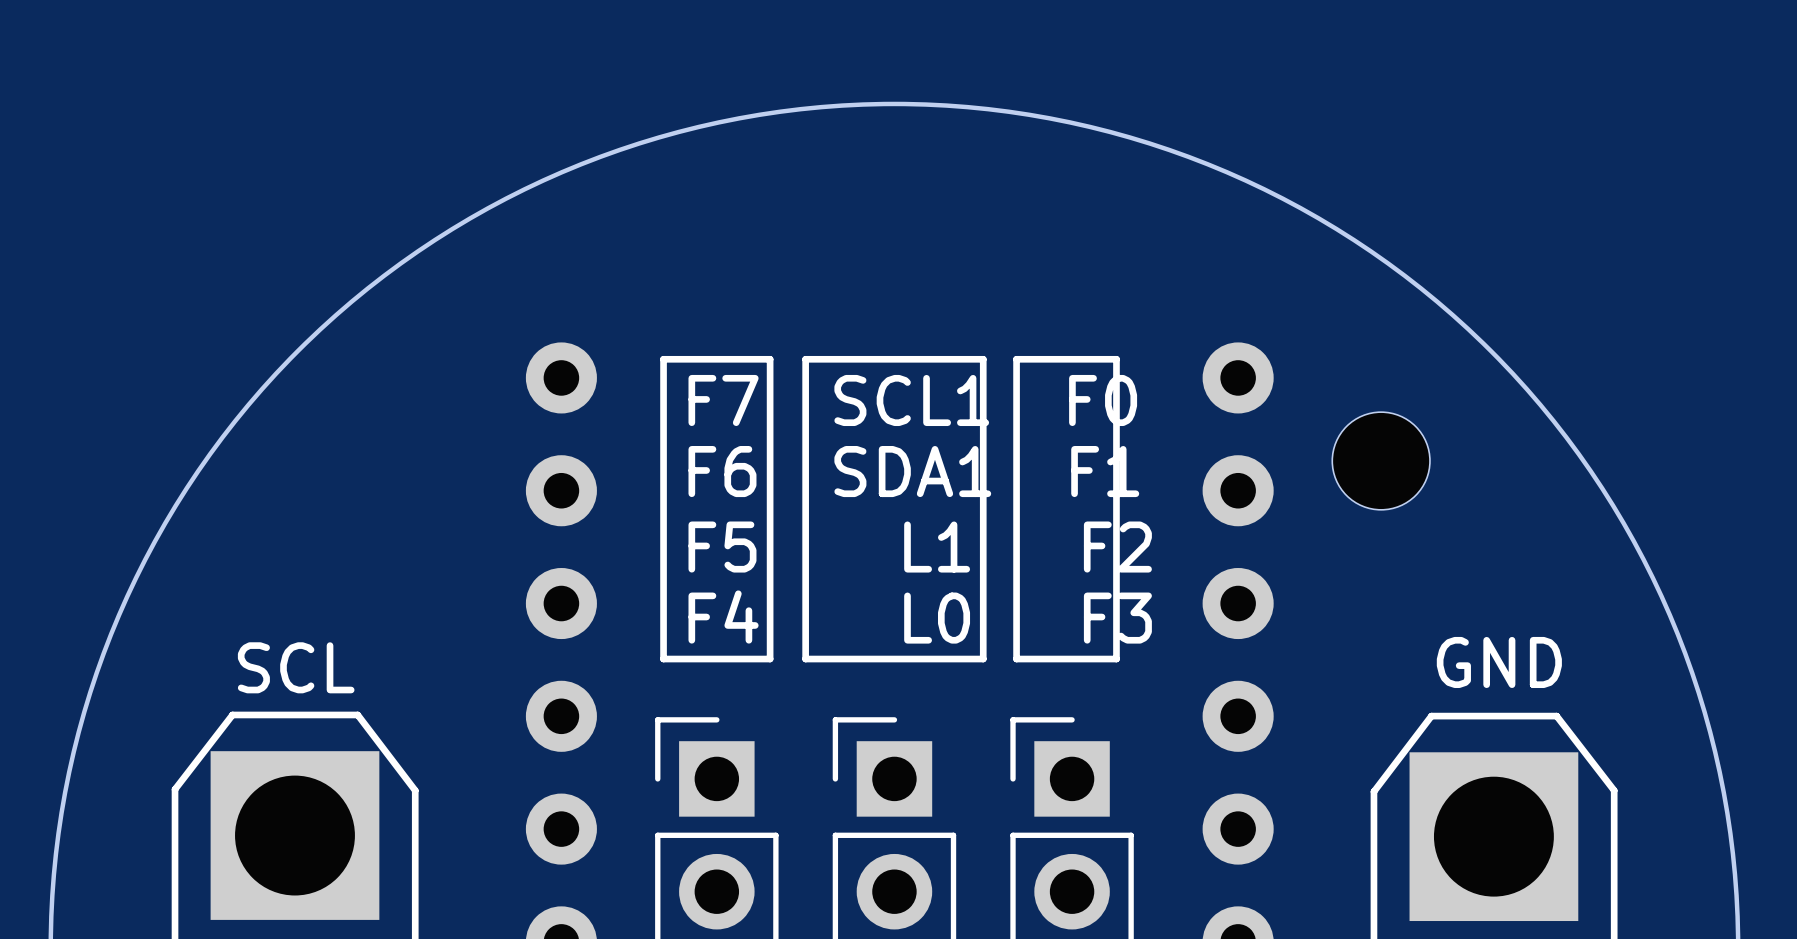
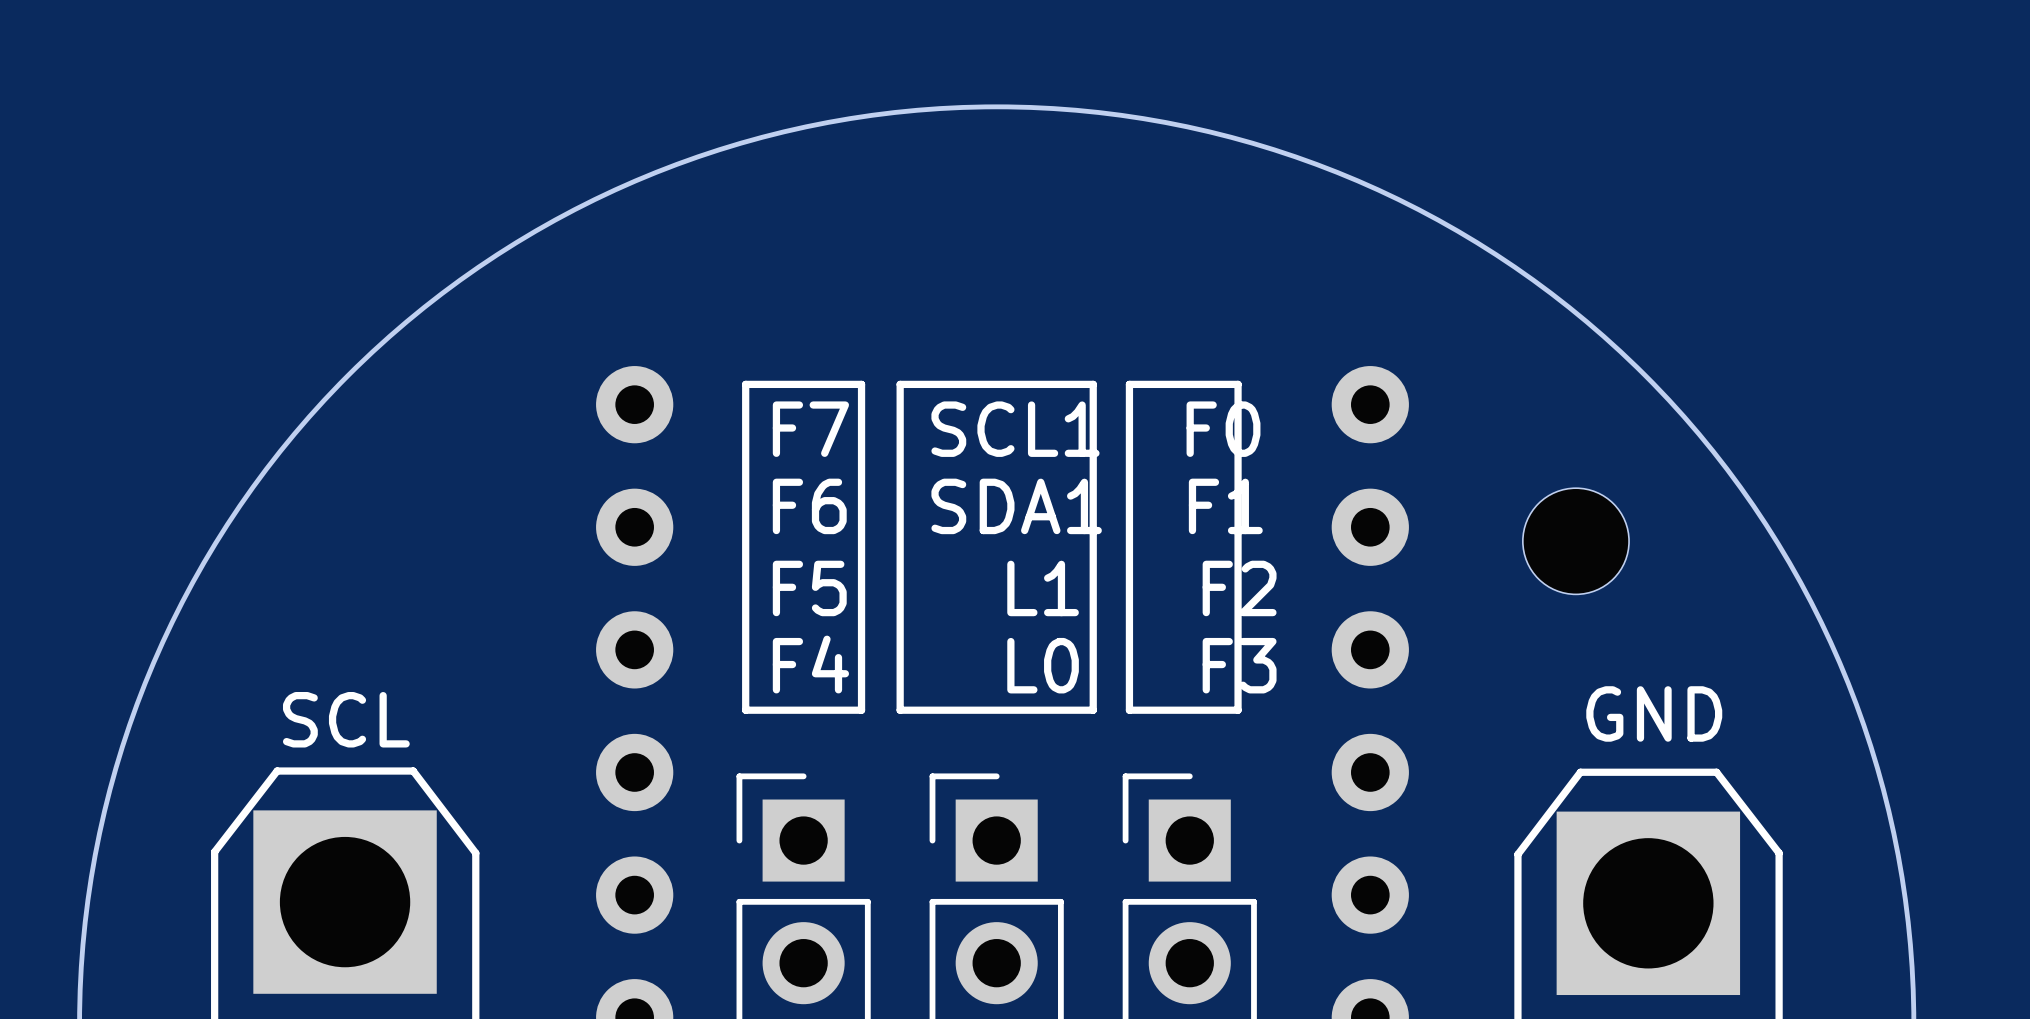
part position: (1381, 460) -> (1575, 541)

